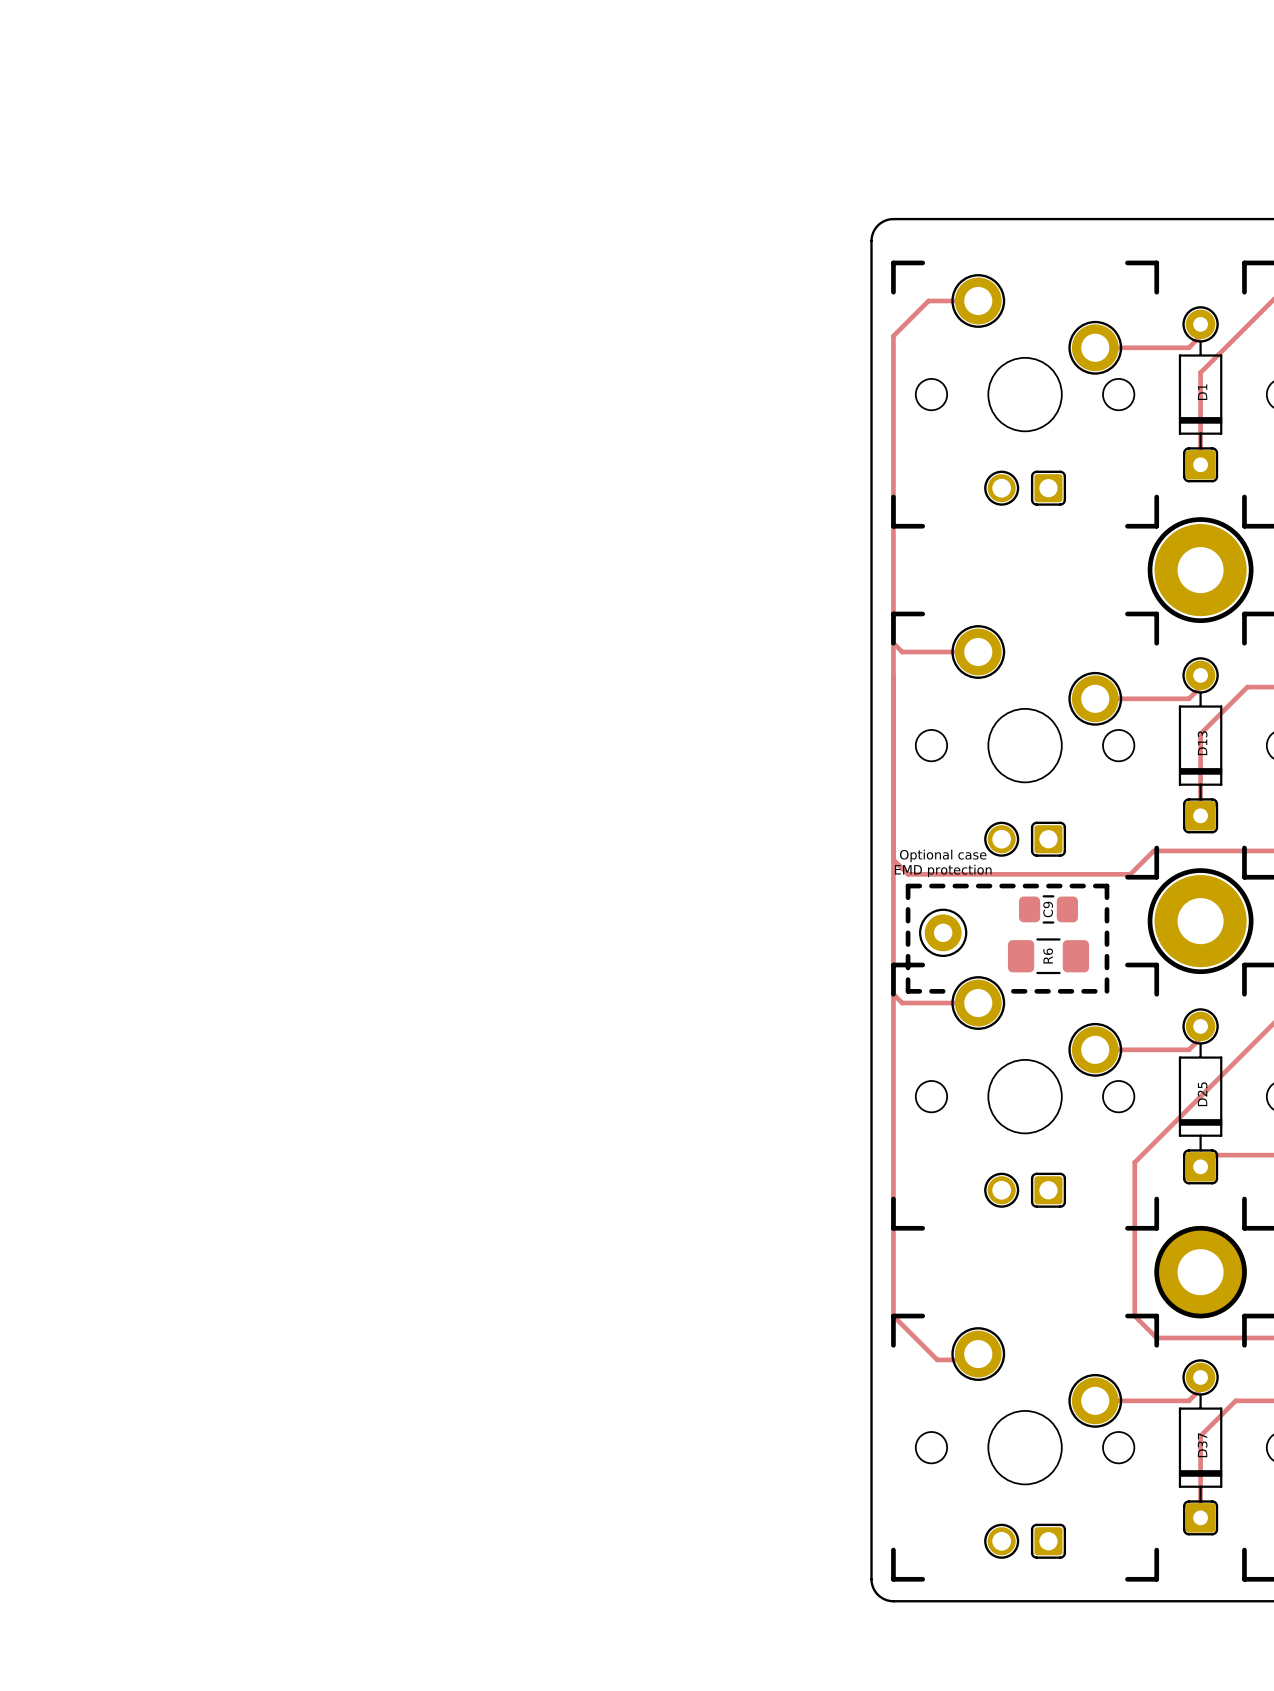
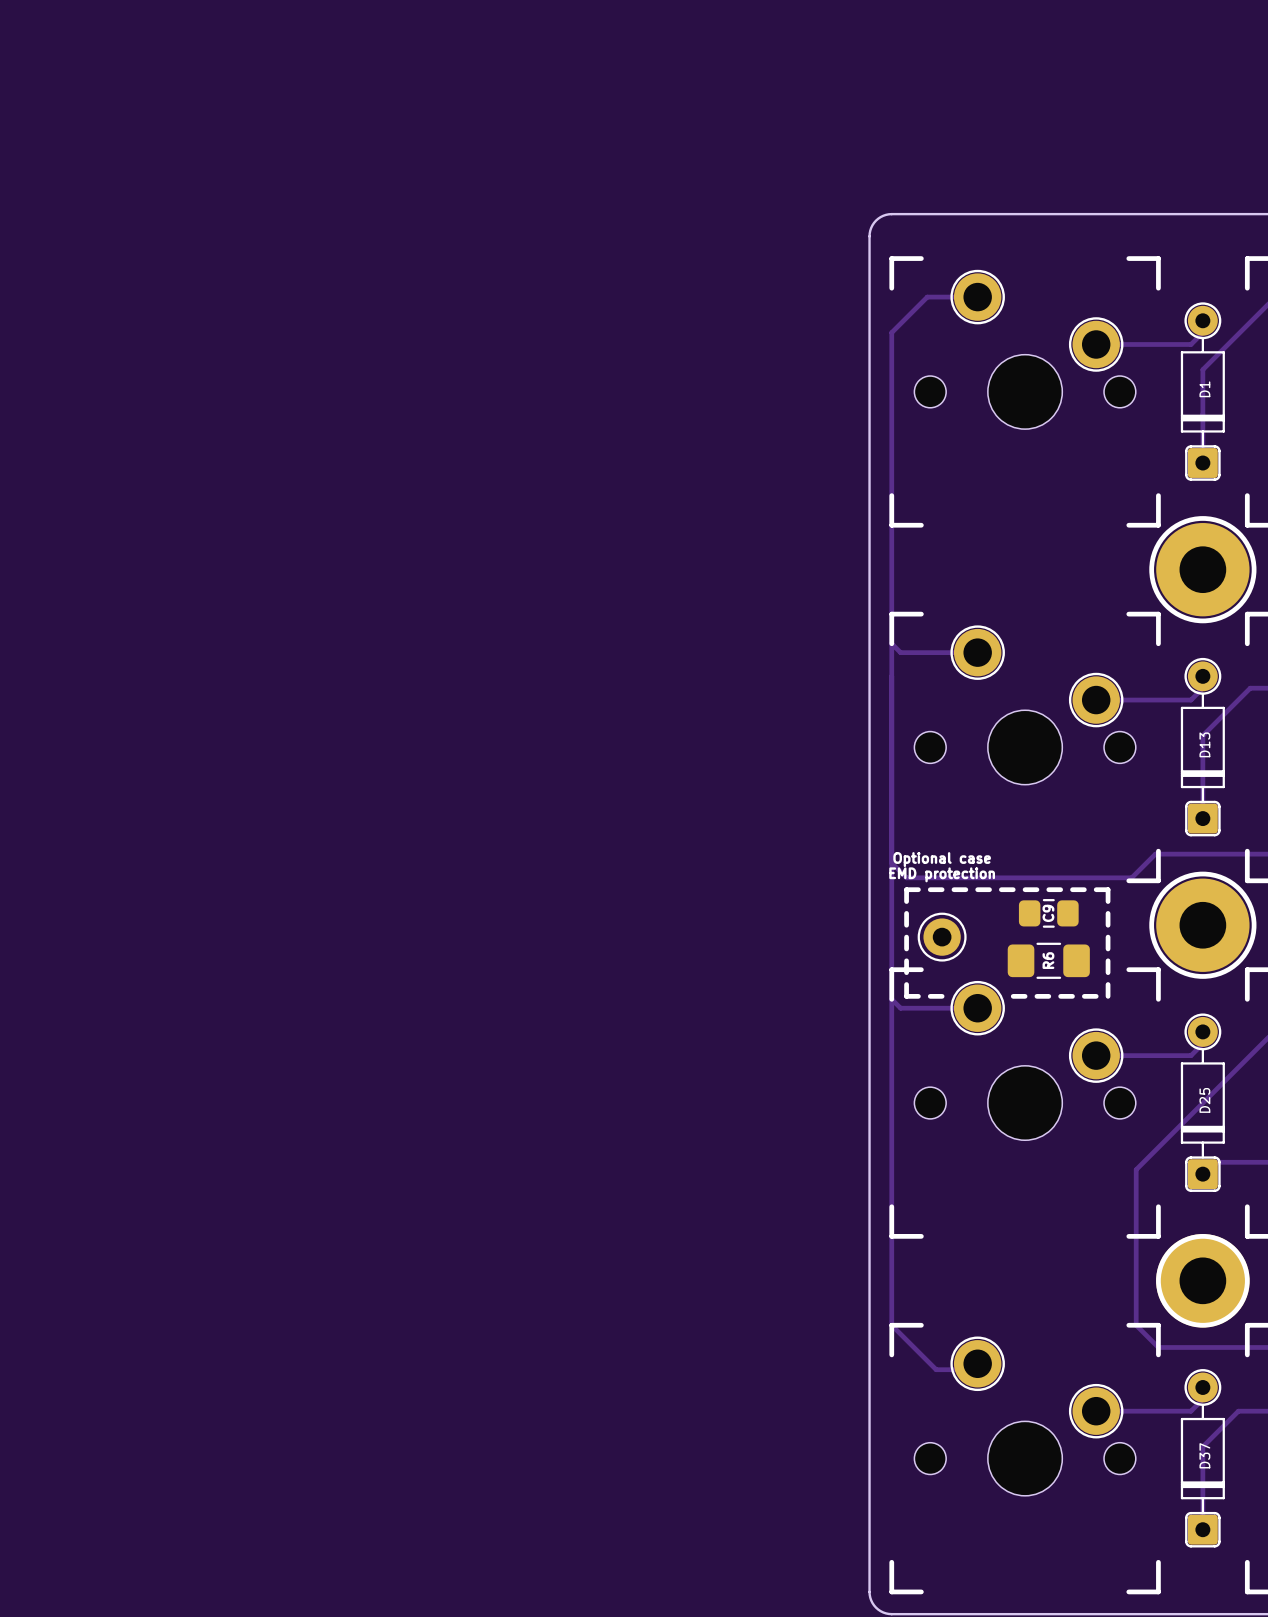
part: (1025, 488) -> none
part: (1025, 839) -> none
part: (1025, 1190) -> none
part: (1025, 1541) -> none

